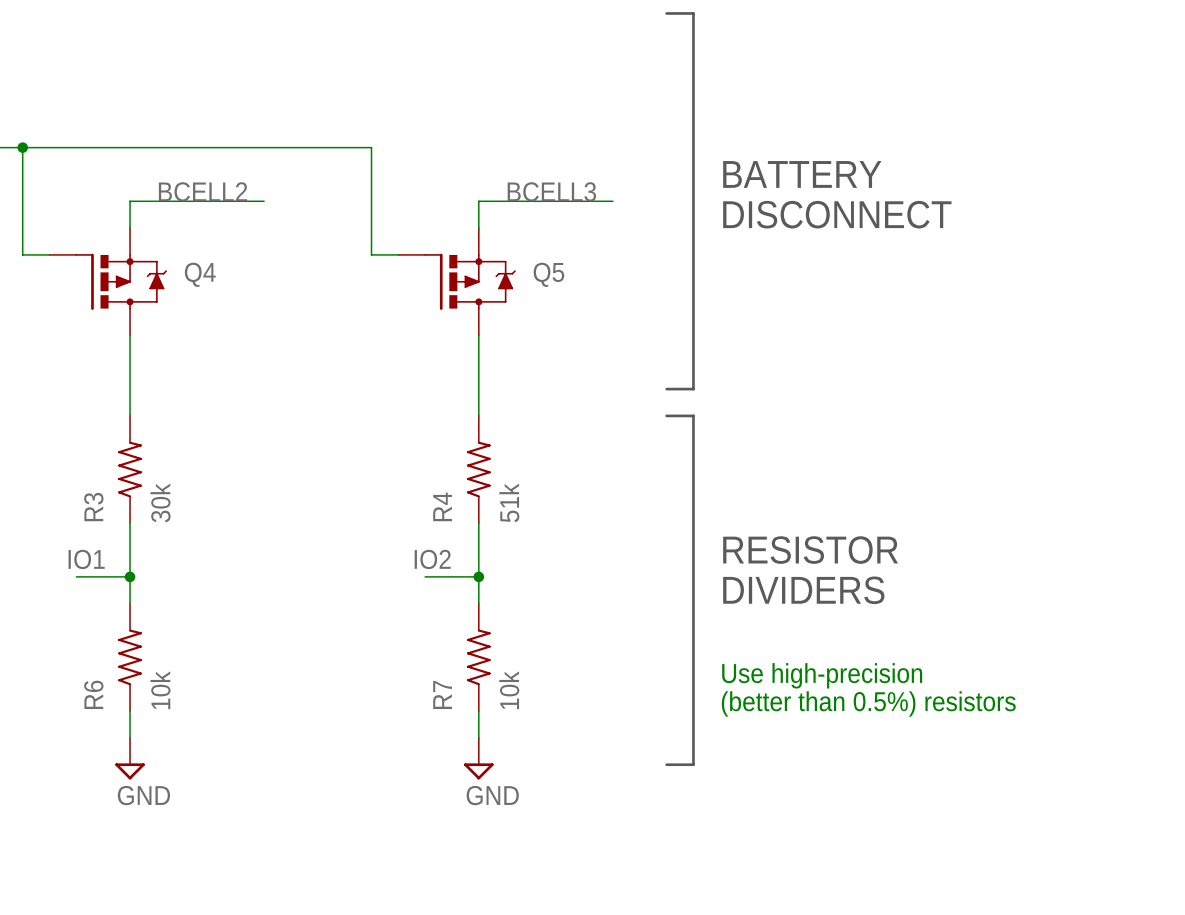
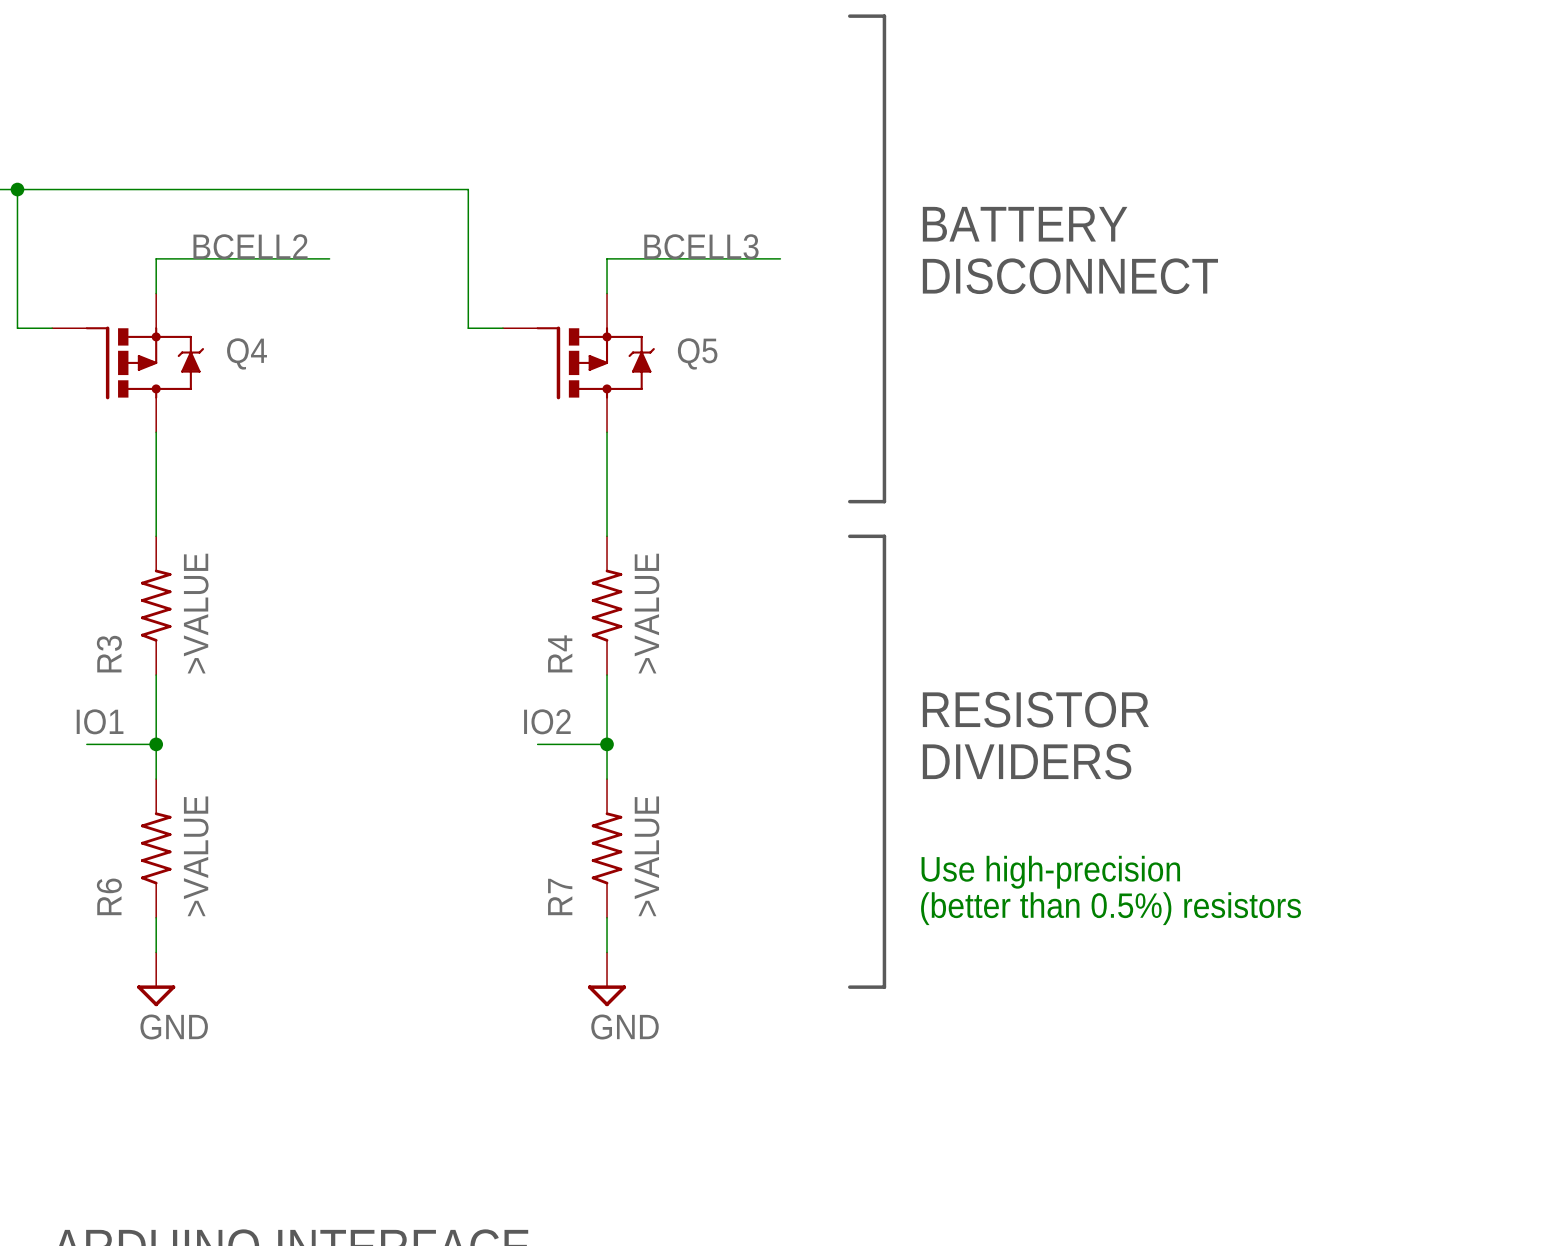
R3 value: 30k (160, 502) -> >VALUE (196, 613)
R4 value: 51k (509, 502) -> >VALUE (647, 613)
R6 value: 10k (160, 690) -> >VALUE (196, 856)
R7 value: 10k (509, 690) -> >VALUE (647, 856)

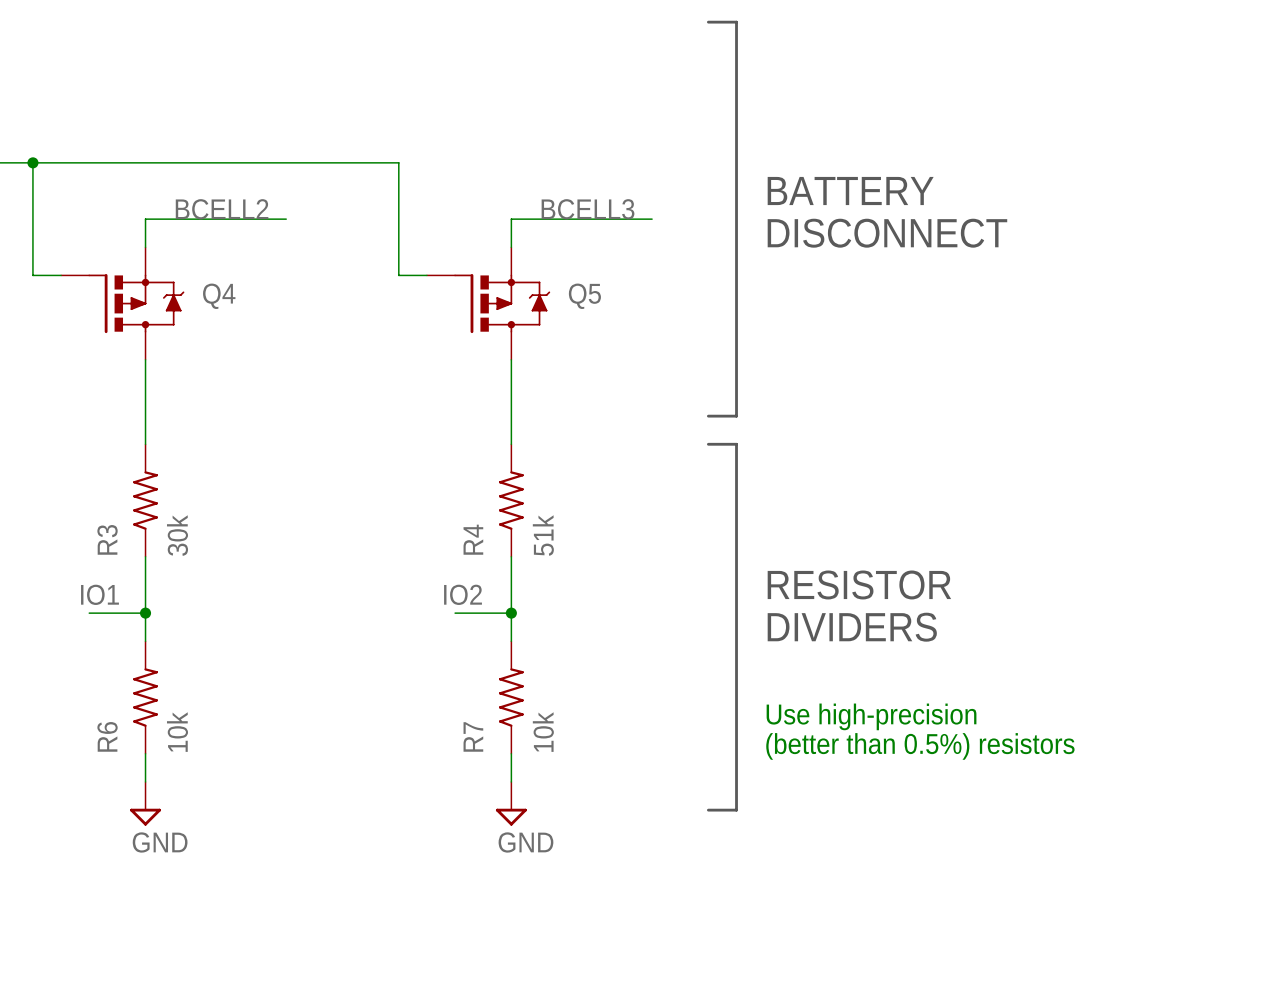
R3 value: >VALUE (196, 613) -> 30k (177, 535)
R4 value: >VALUE (647, 613) -> 51k (543, 535)
R6 value: >VALUE (196, 856) -> 10k (177, 732)
R7 value: >VALUE (647, 856) -> 10k (543, 732)

